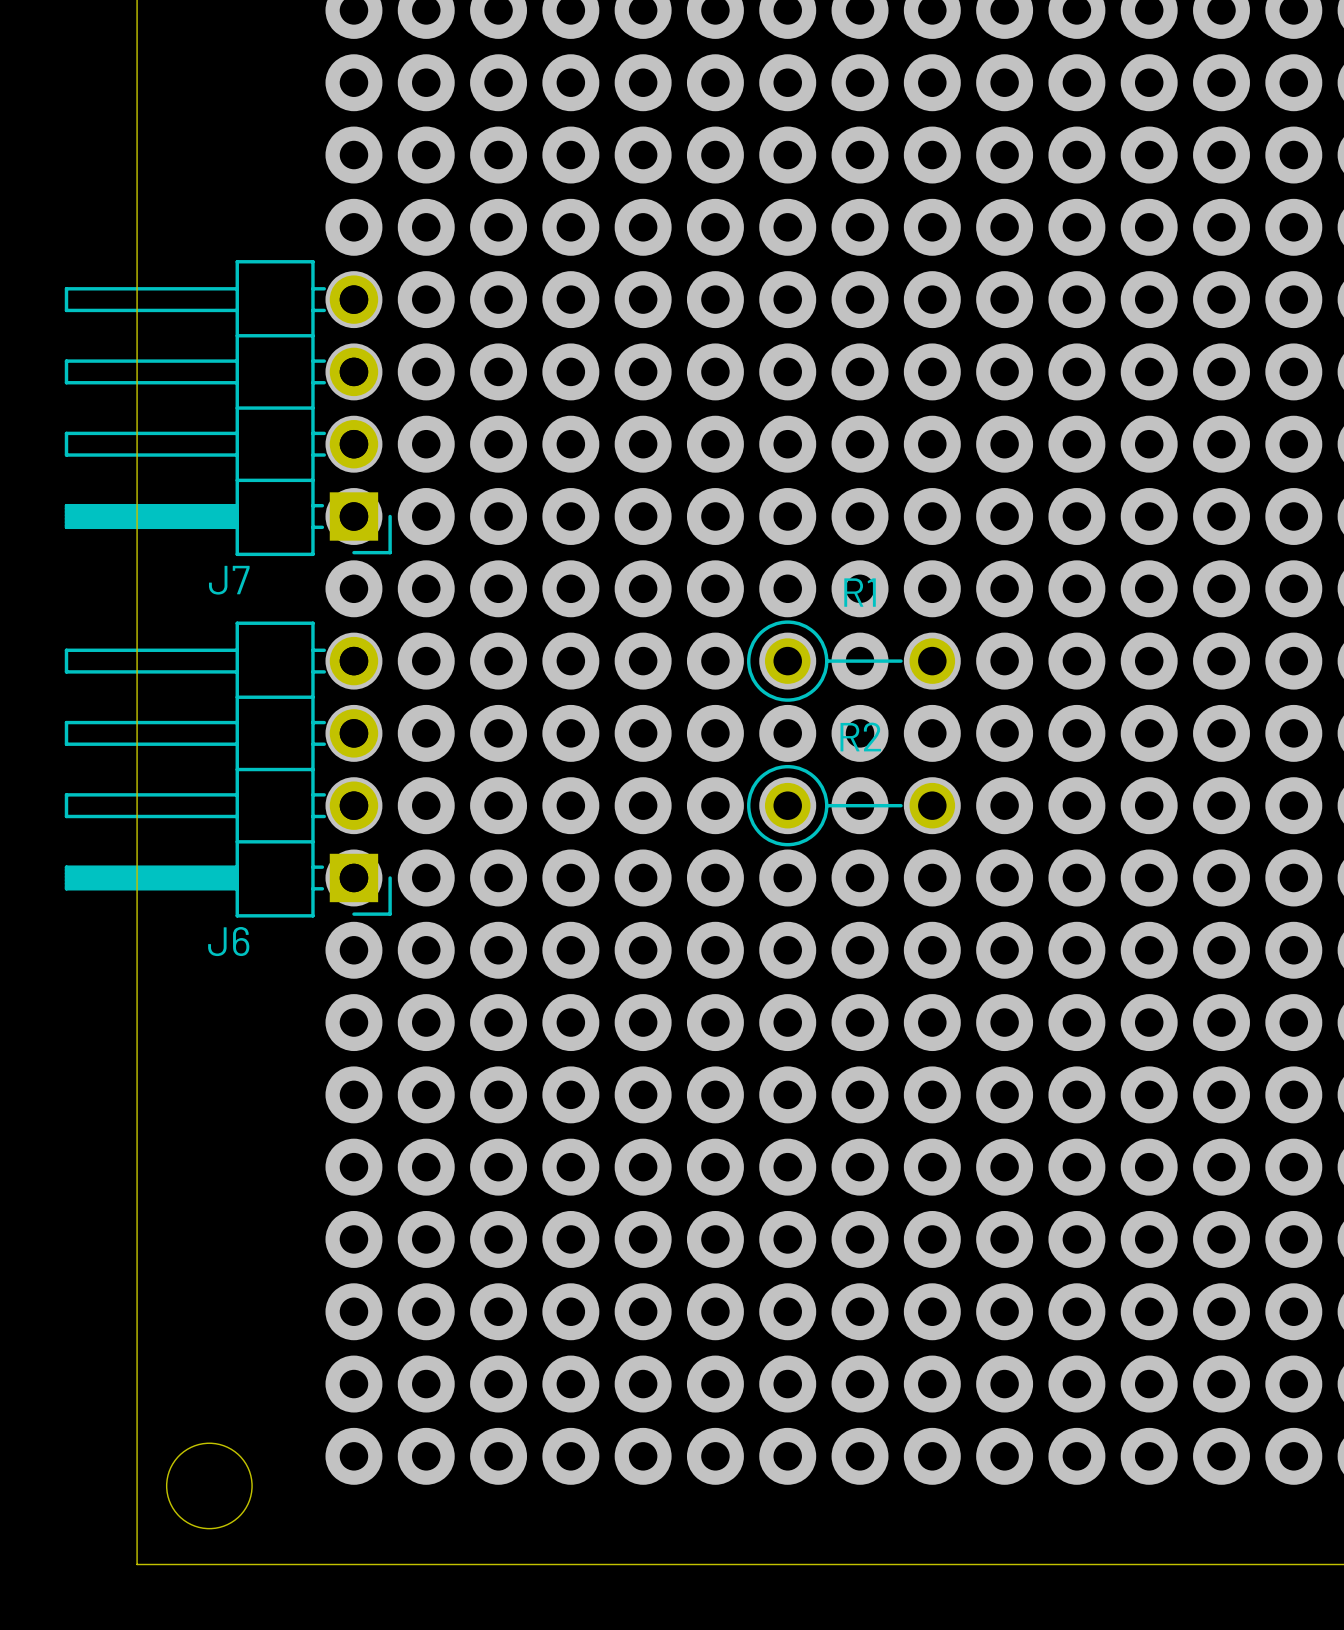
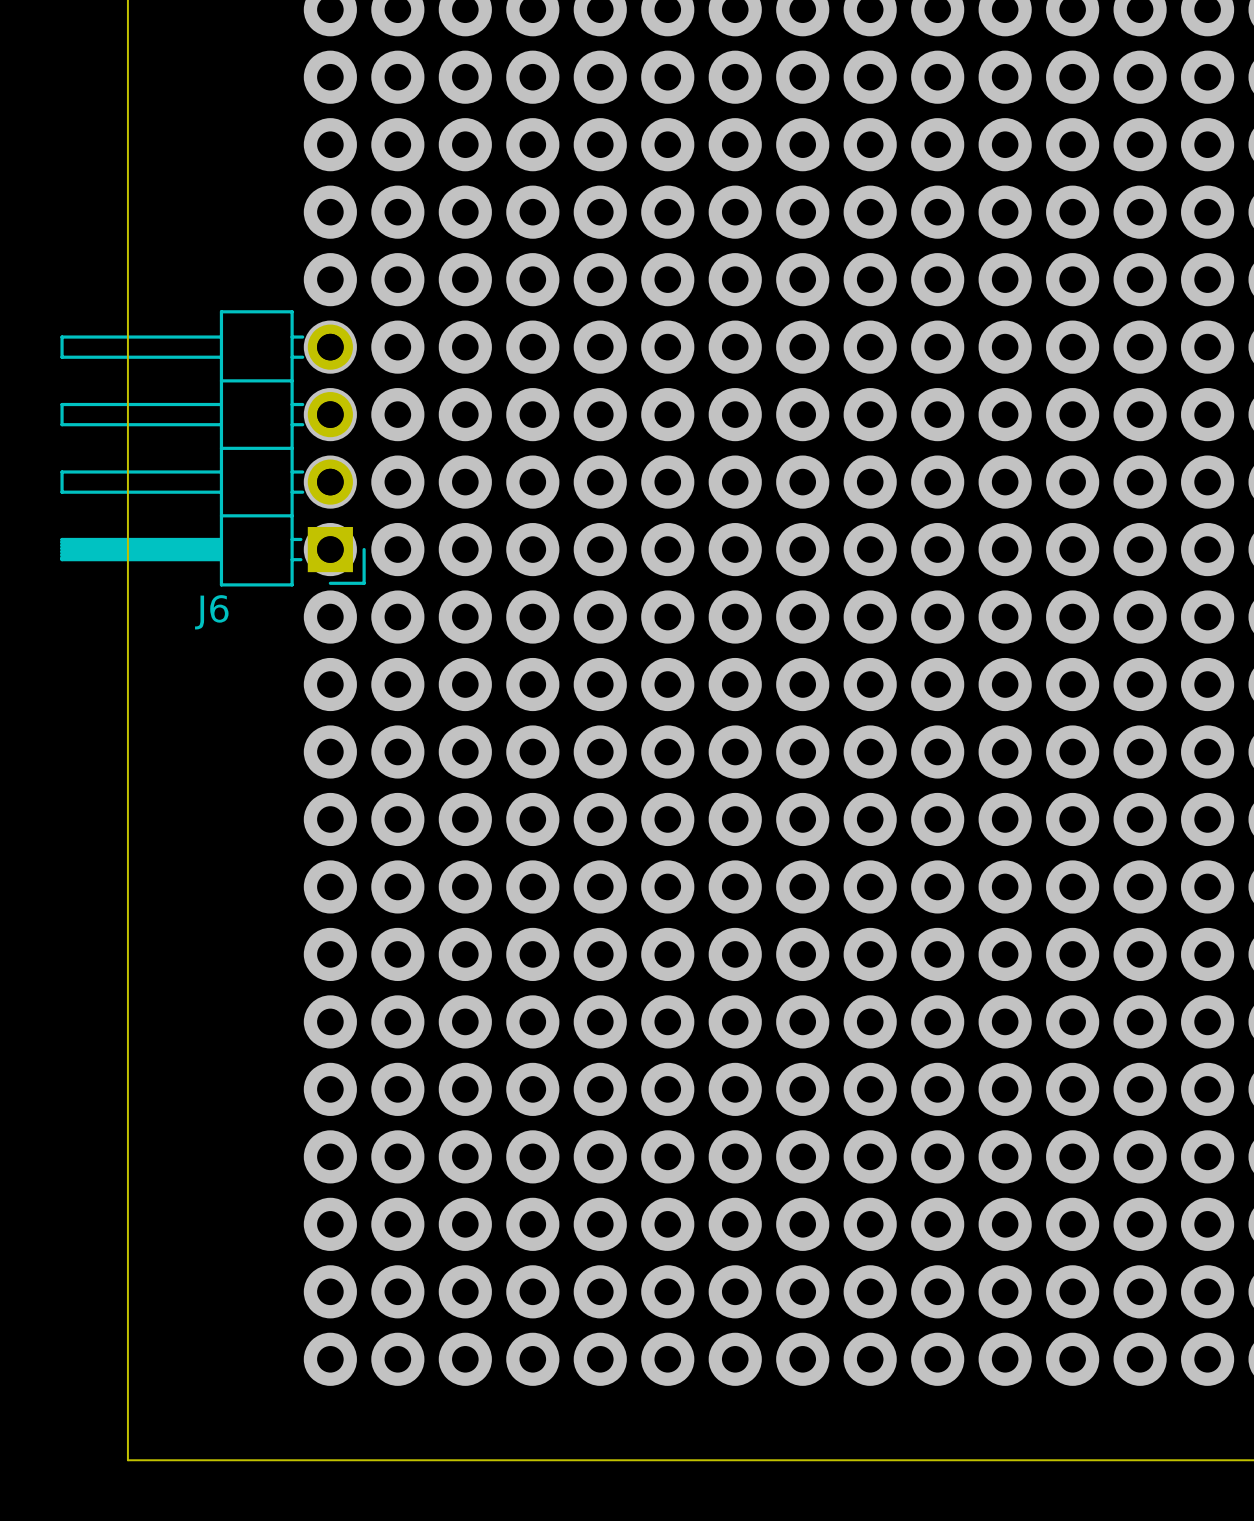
J7: (228, 408) -> none
R1: (851, 661) -> none
J6 position: (228, 769) -> (213, 448)
R2: (851, 805) -> none
round board edge: [165, 1442, 253, 1530] -> none

